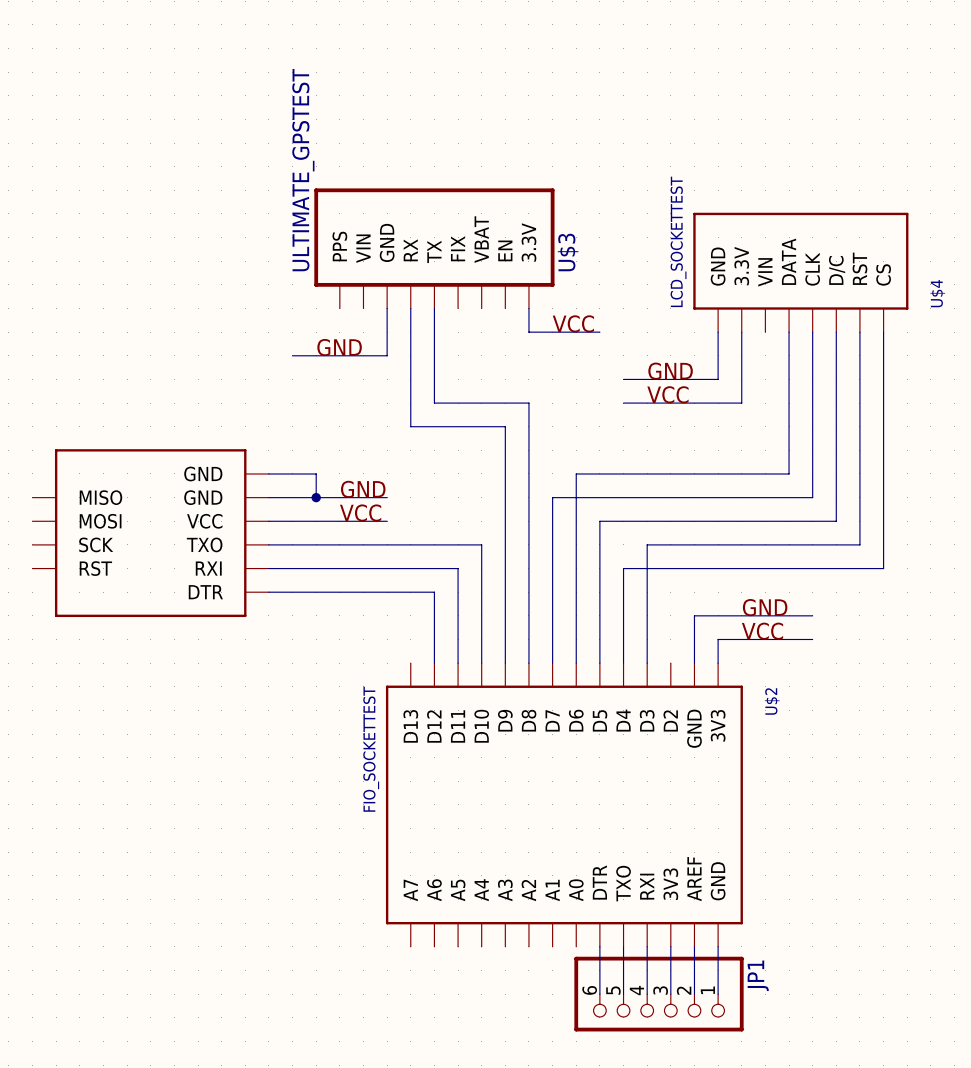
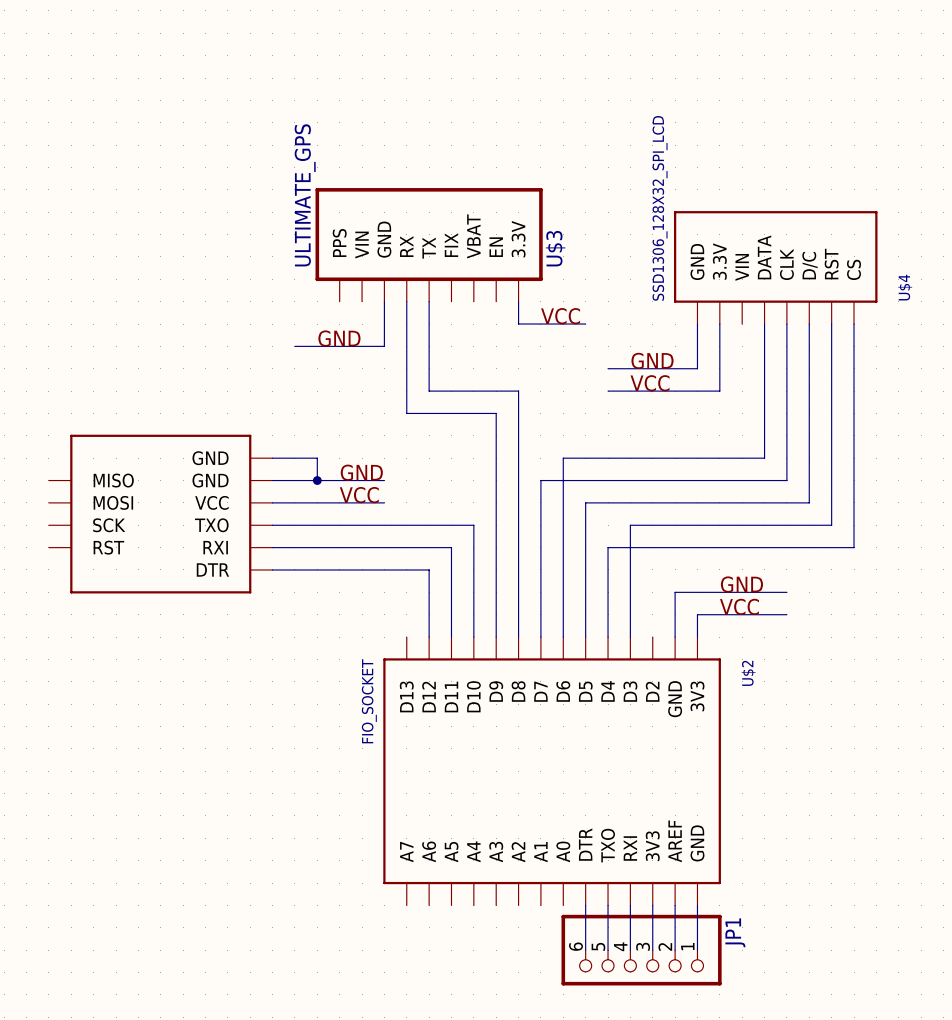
U$3 value: ULTIMATE_GPSTEST (303, 170) -> ULTIMATE_GPS (305, 195)
U$4 value: LCD_SOCKETTEST (678, 241) -> SSD1306_128X32_SPI_LCD (660, 208)
U$2 value: FIO_SOCKETTEST (371, 749) -> FIO_SOCKET (369, 701)

